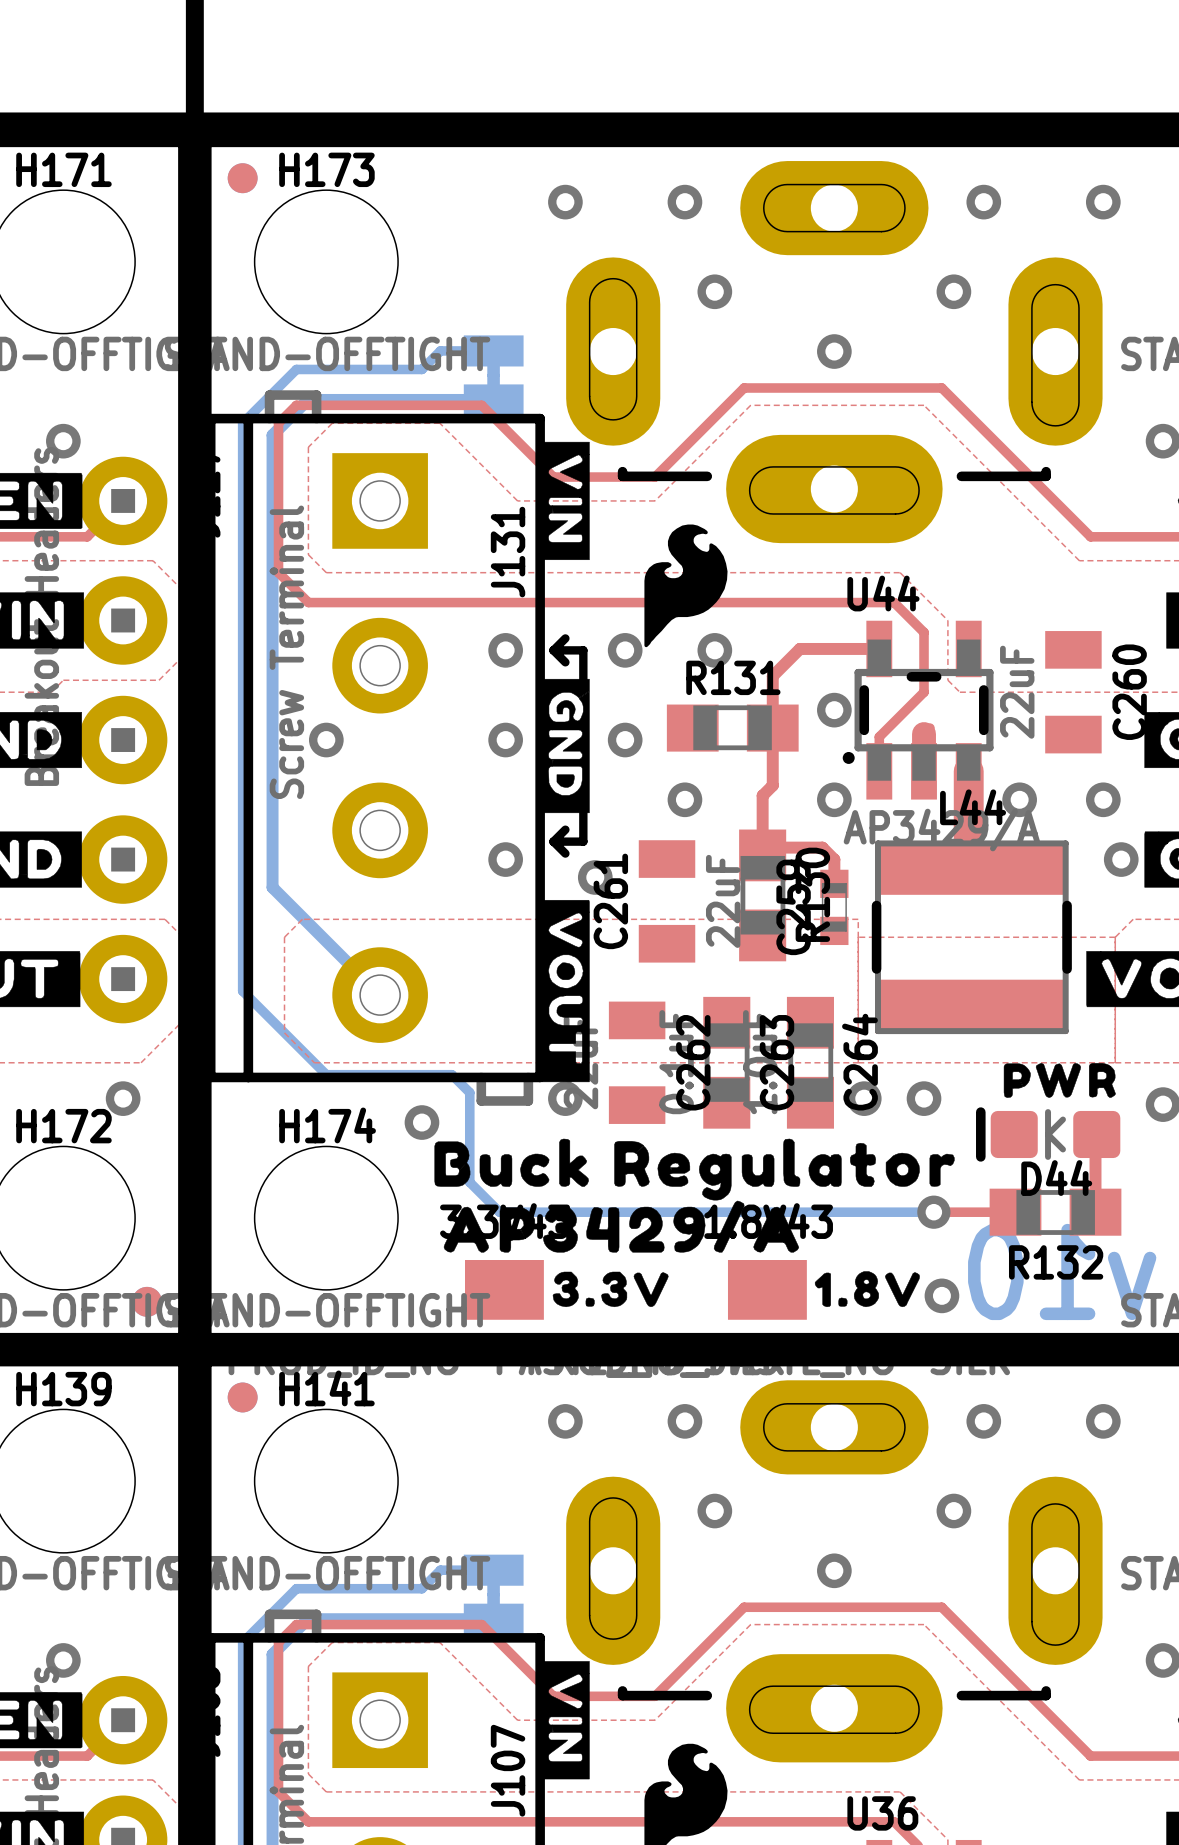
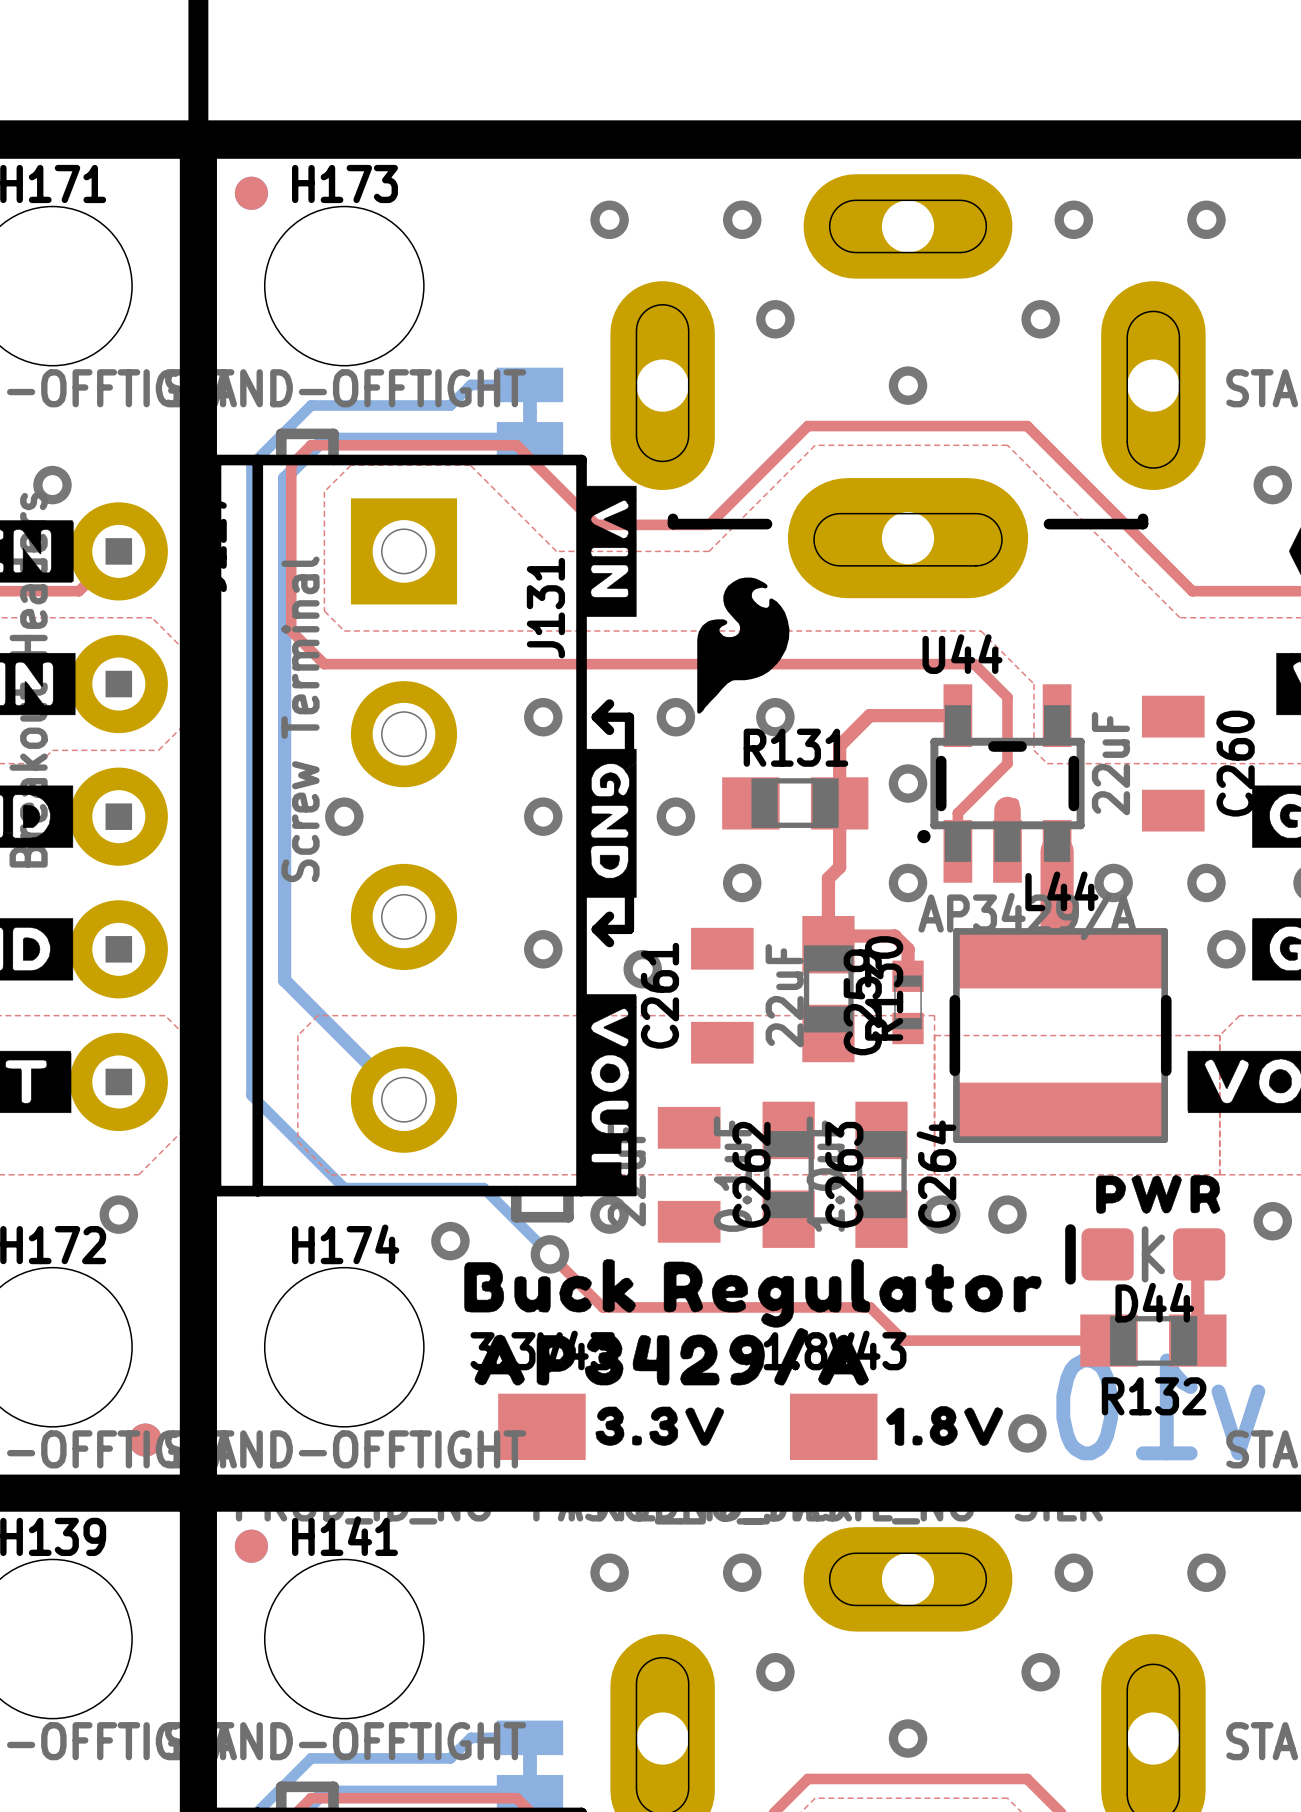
bottom track: (469, 1092) (469, 1182) (499, 1212) (933, 1212) -> (503, 1207) (549, 1254)
top track: none -> (549, 1254) (602, 1307) (870, 1307) (903, 1340) (1018, 1340)
via: none -> (549, 1254)
via: (933, 1212) -> none

